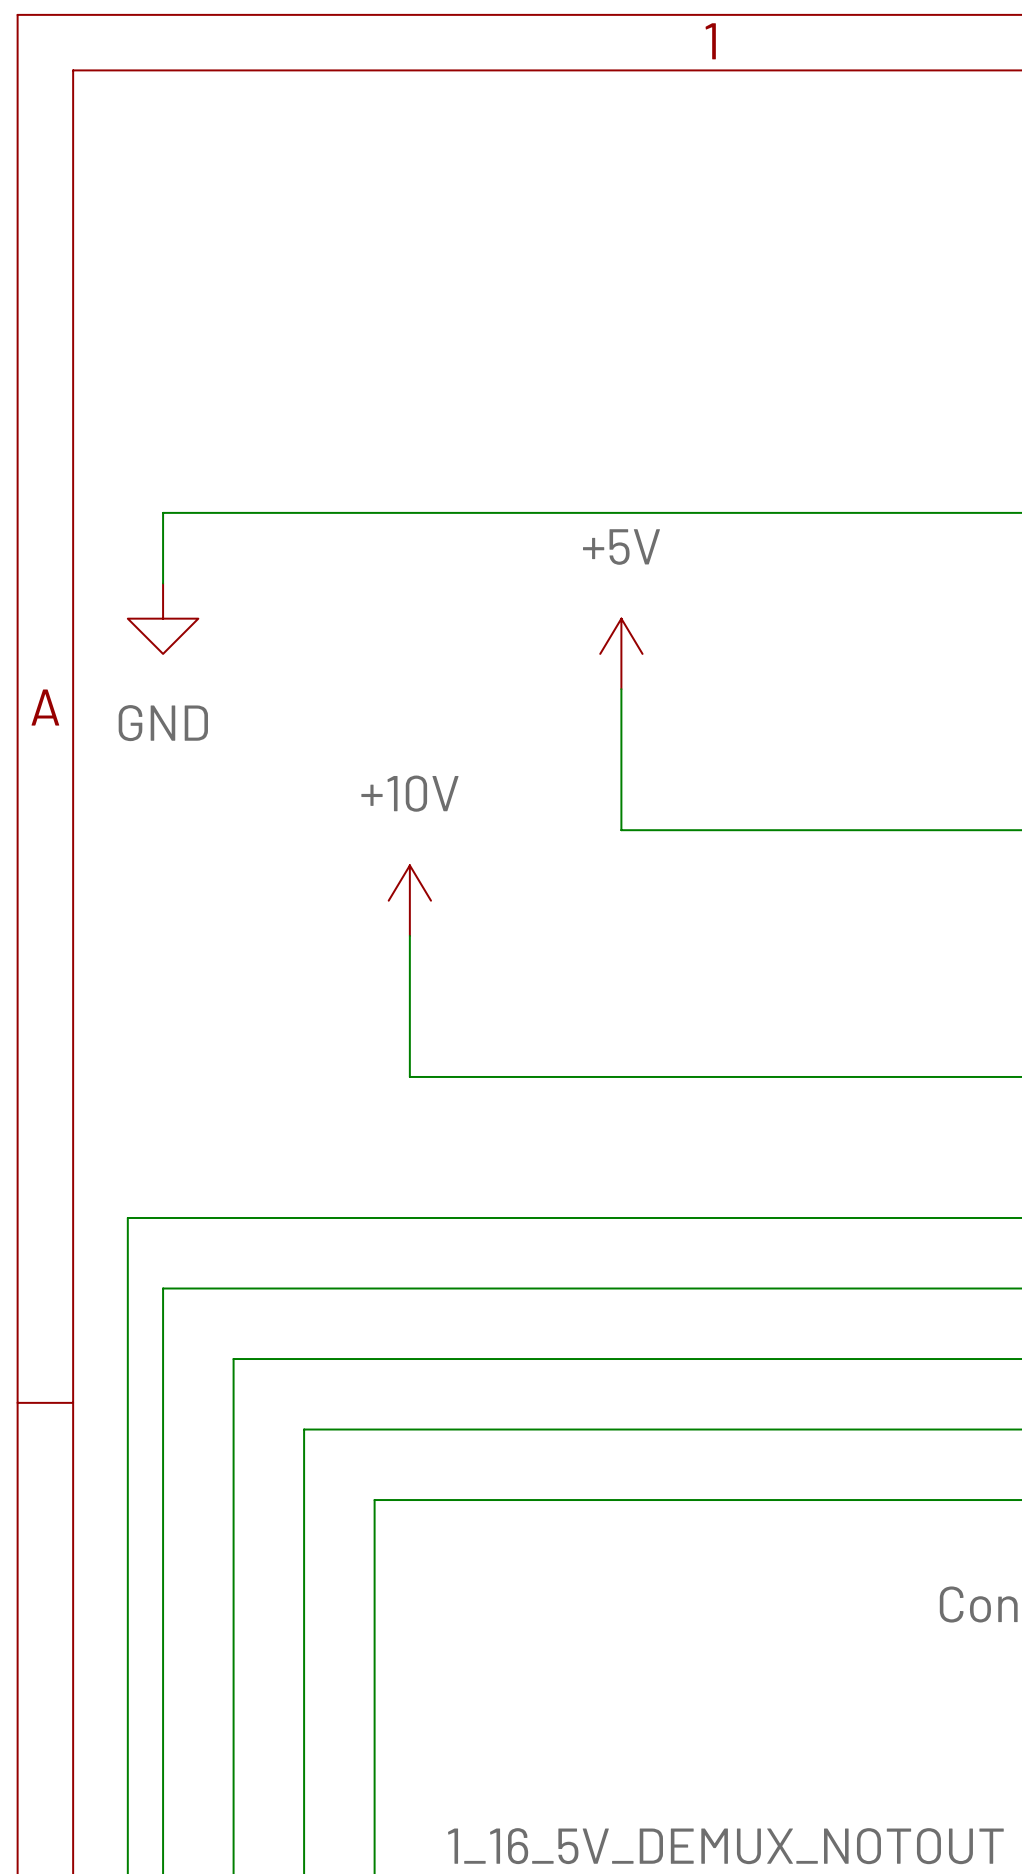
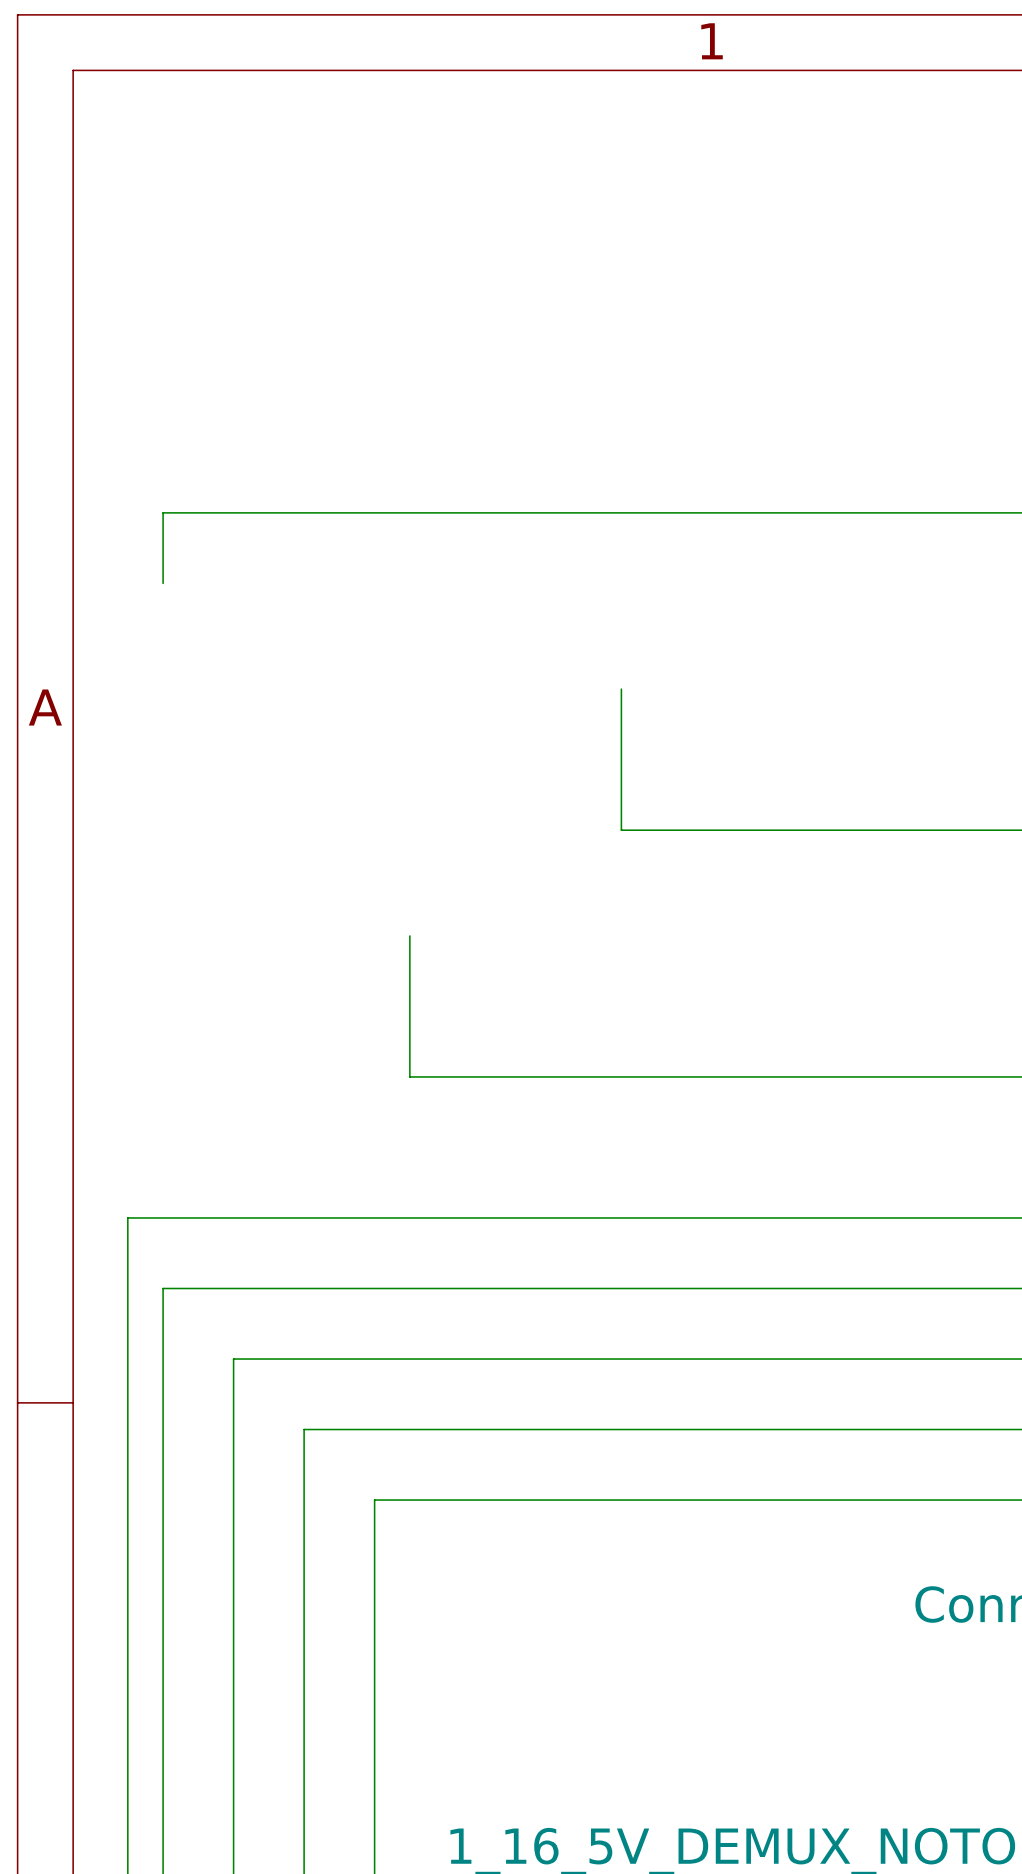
power symbol: GND (163, 618) -> none
power symbol: +5V (621, 653) -> none
power symbol: +10V (409, 900) -> none

